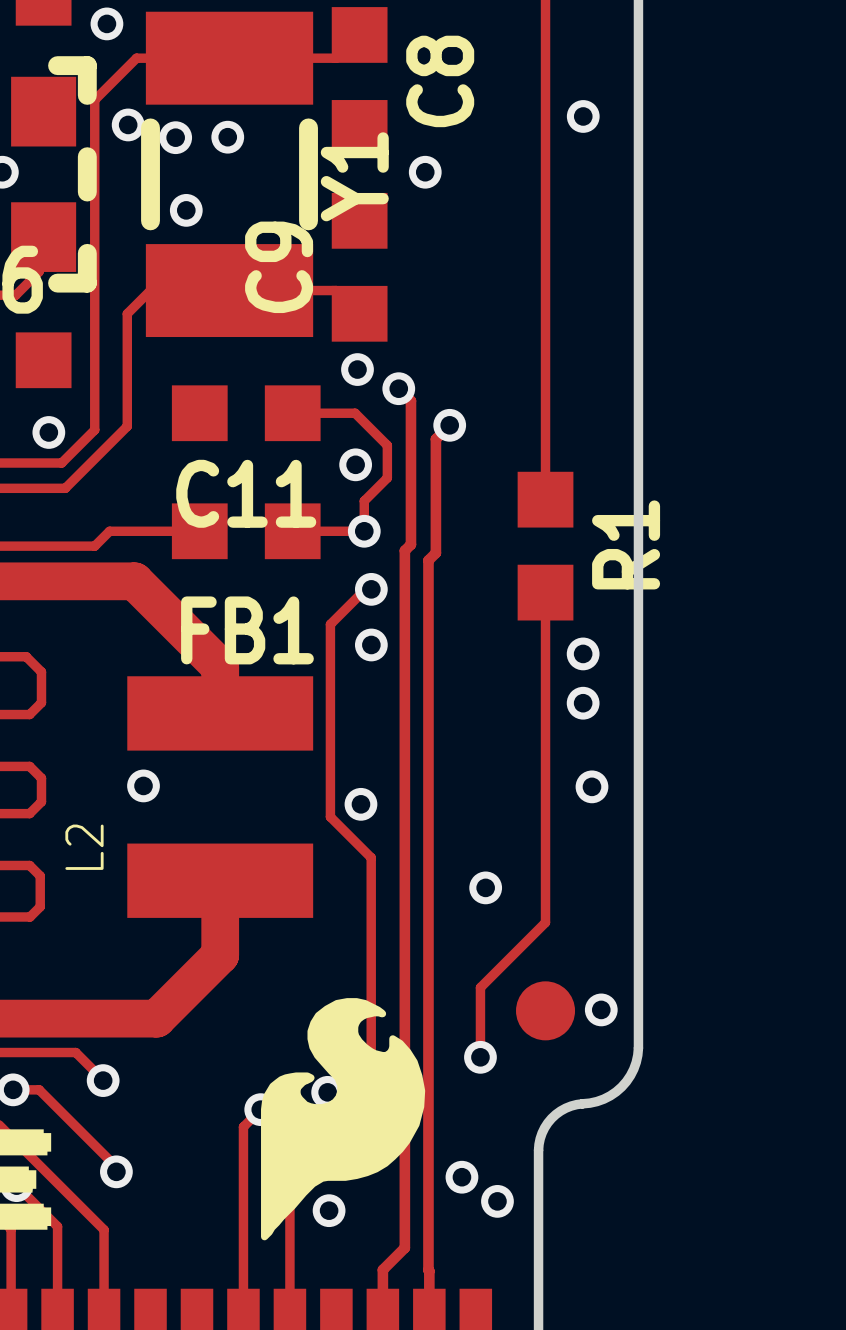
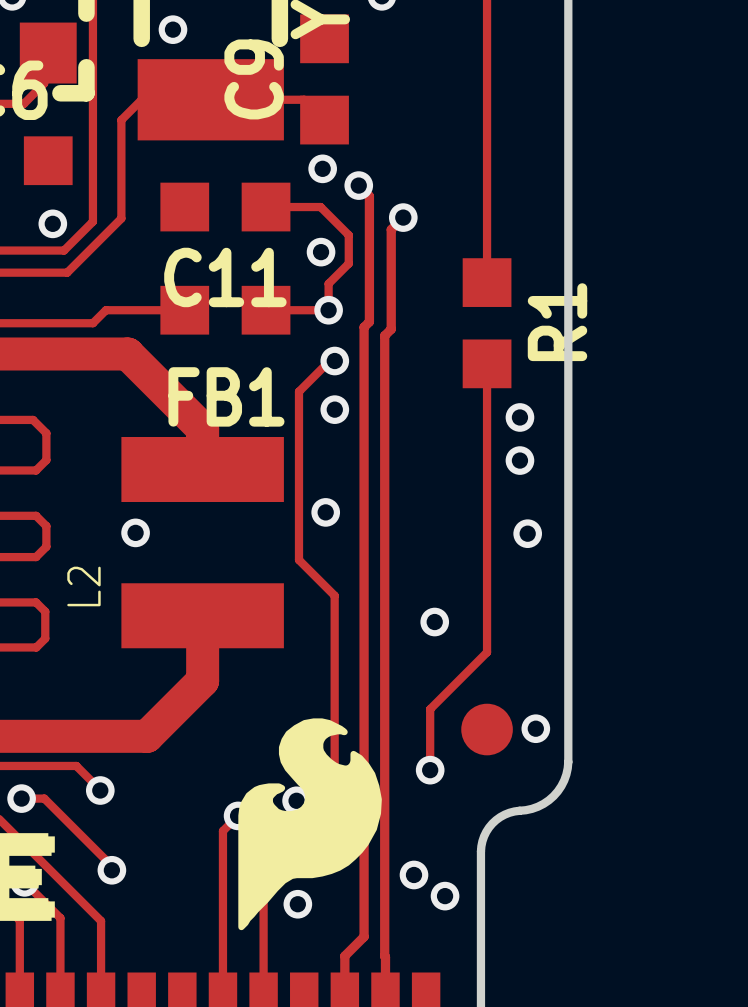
via position: (360, 804) -> (325, 512)

